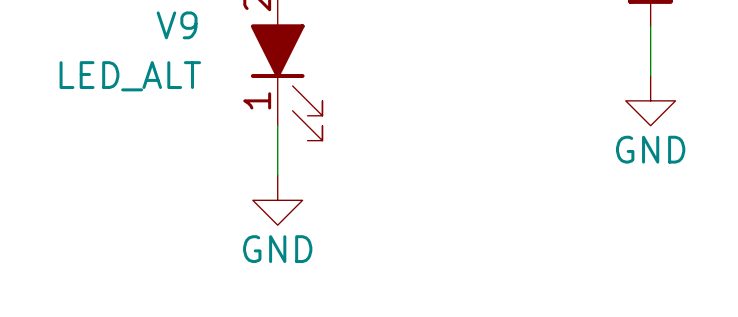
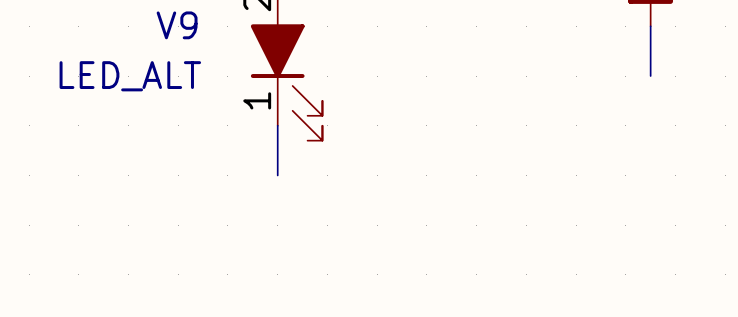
power symbol: GND (650, 100) -> none
power symbol: GND (277, 200) -> none

